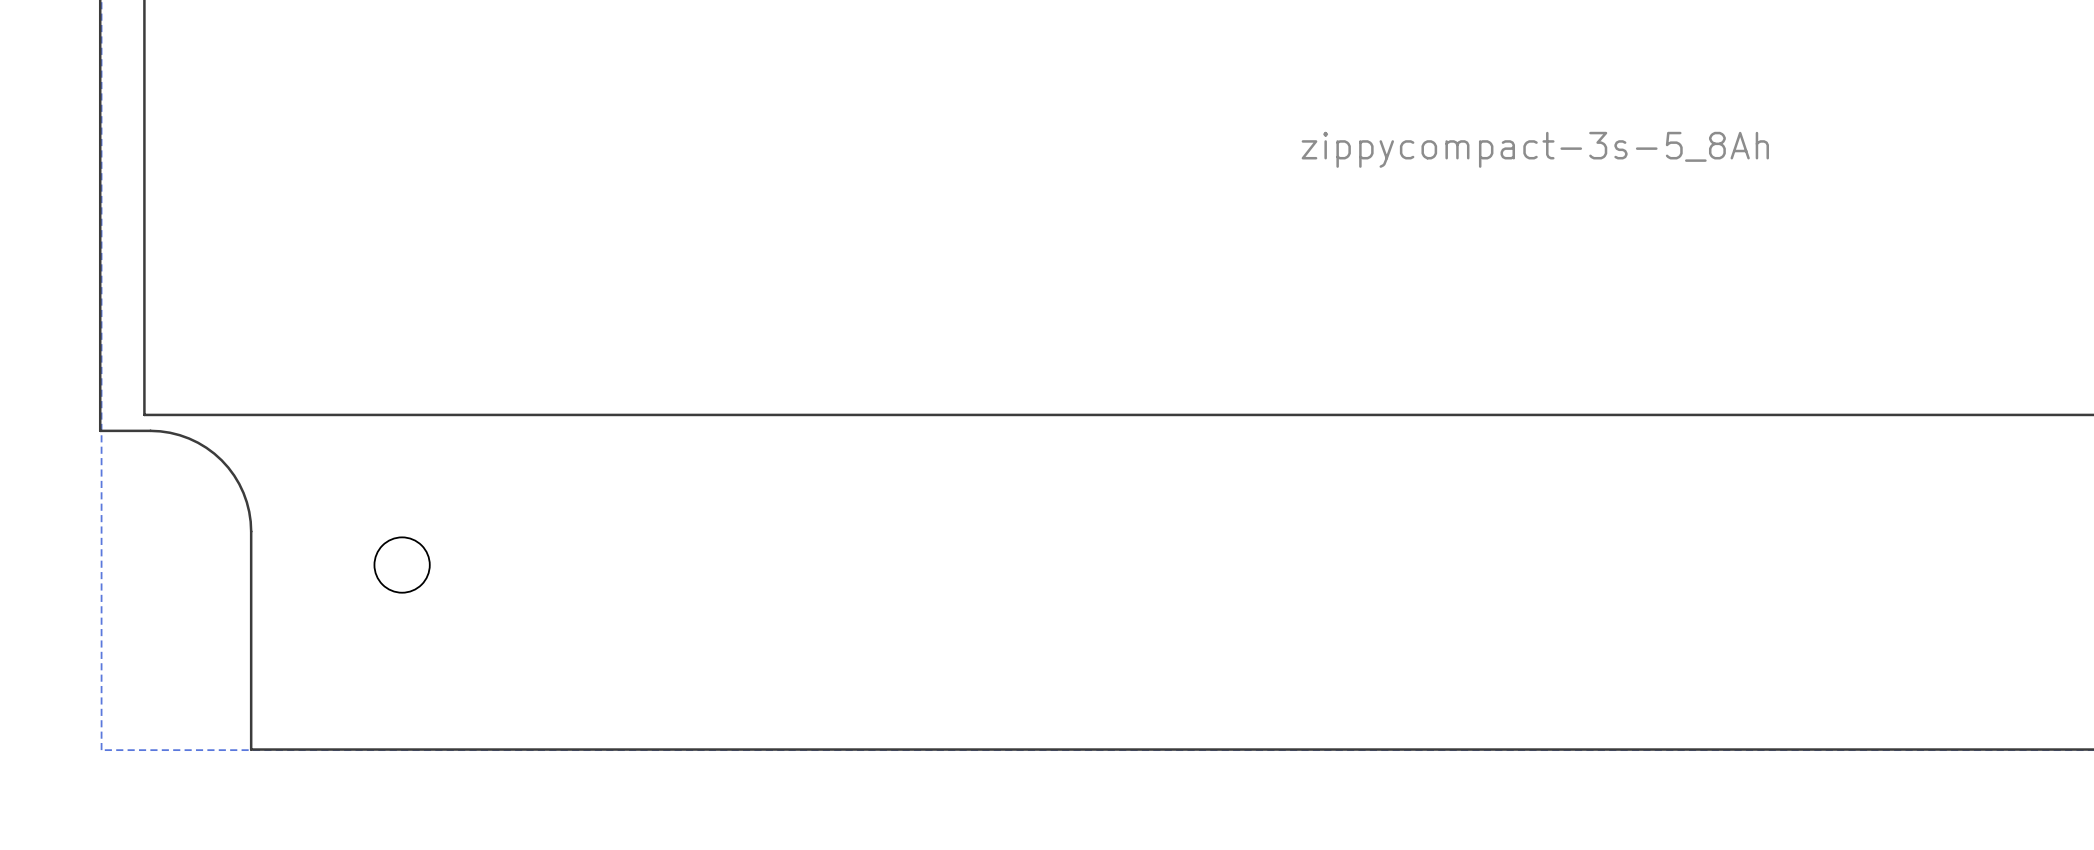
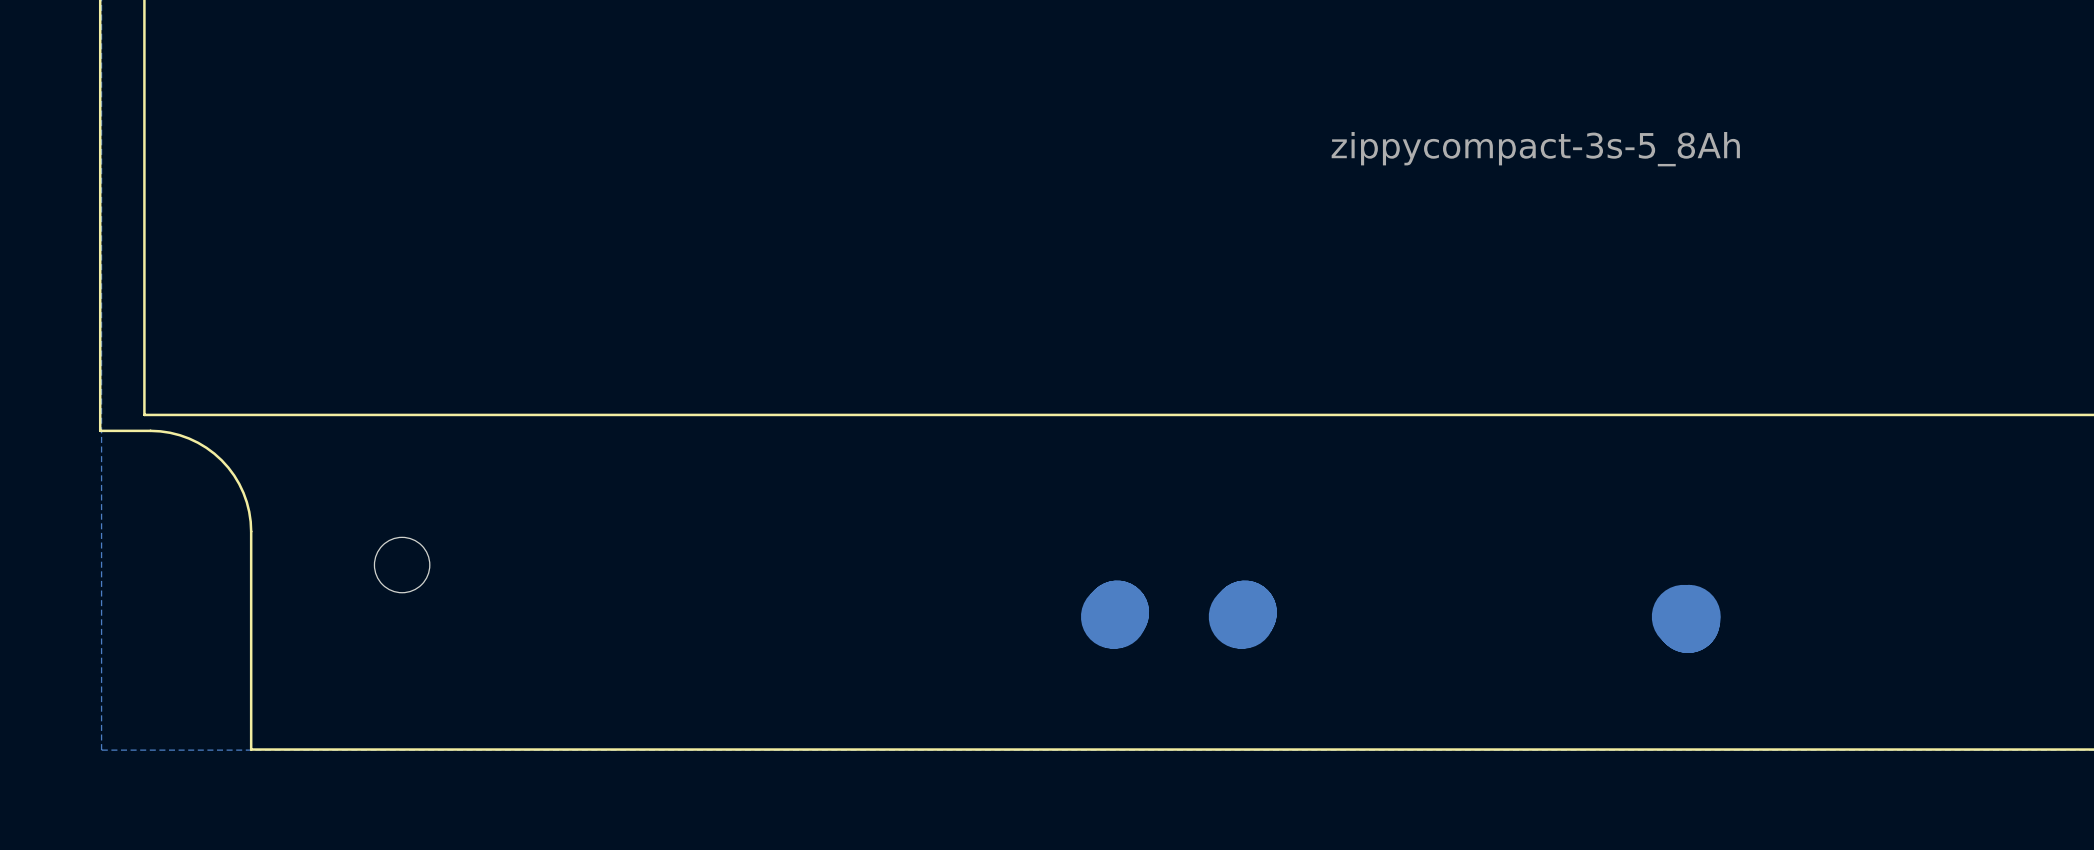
bottom track: none -> (1112, 616) (1117, 612) (1115, 616)
bottom track: none -> (1240, 616) (1244, 612) (1242, 616)
bottom track: none -> (1683, 616) (1688, 621) (1688, 616)

